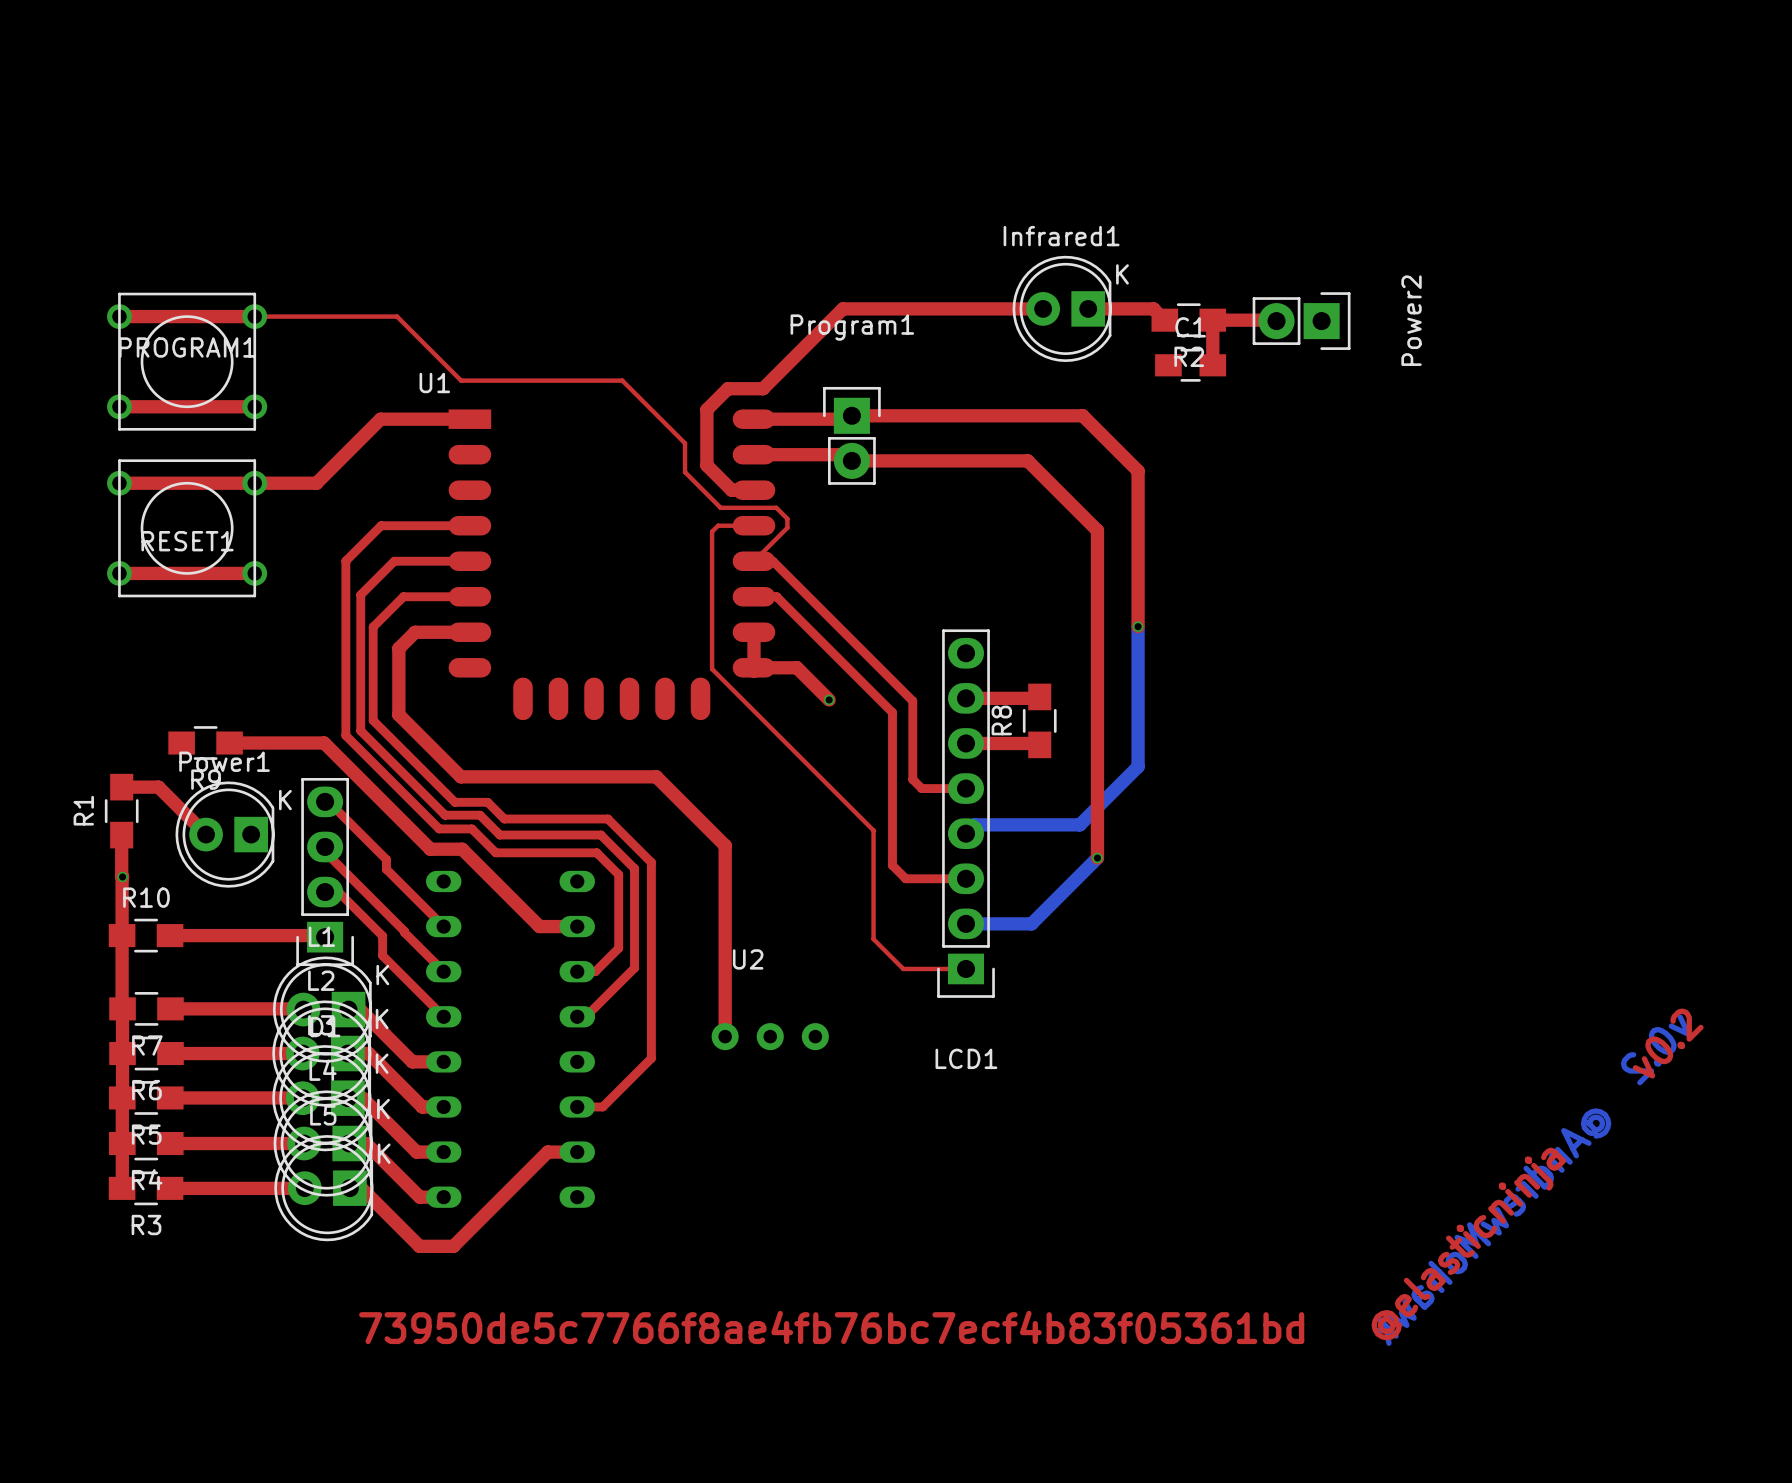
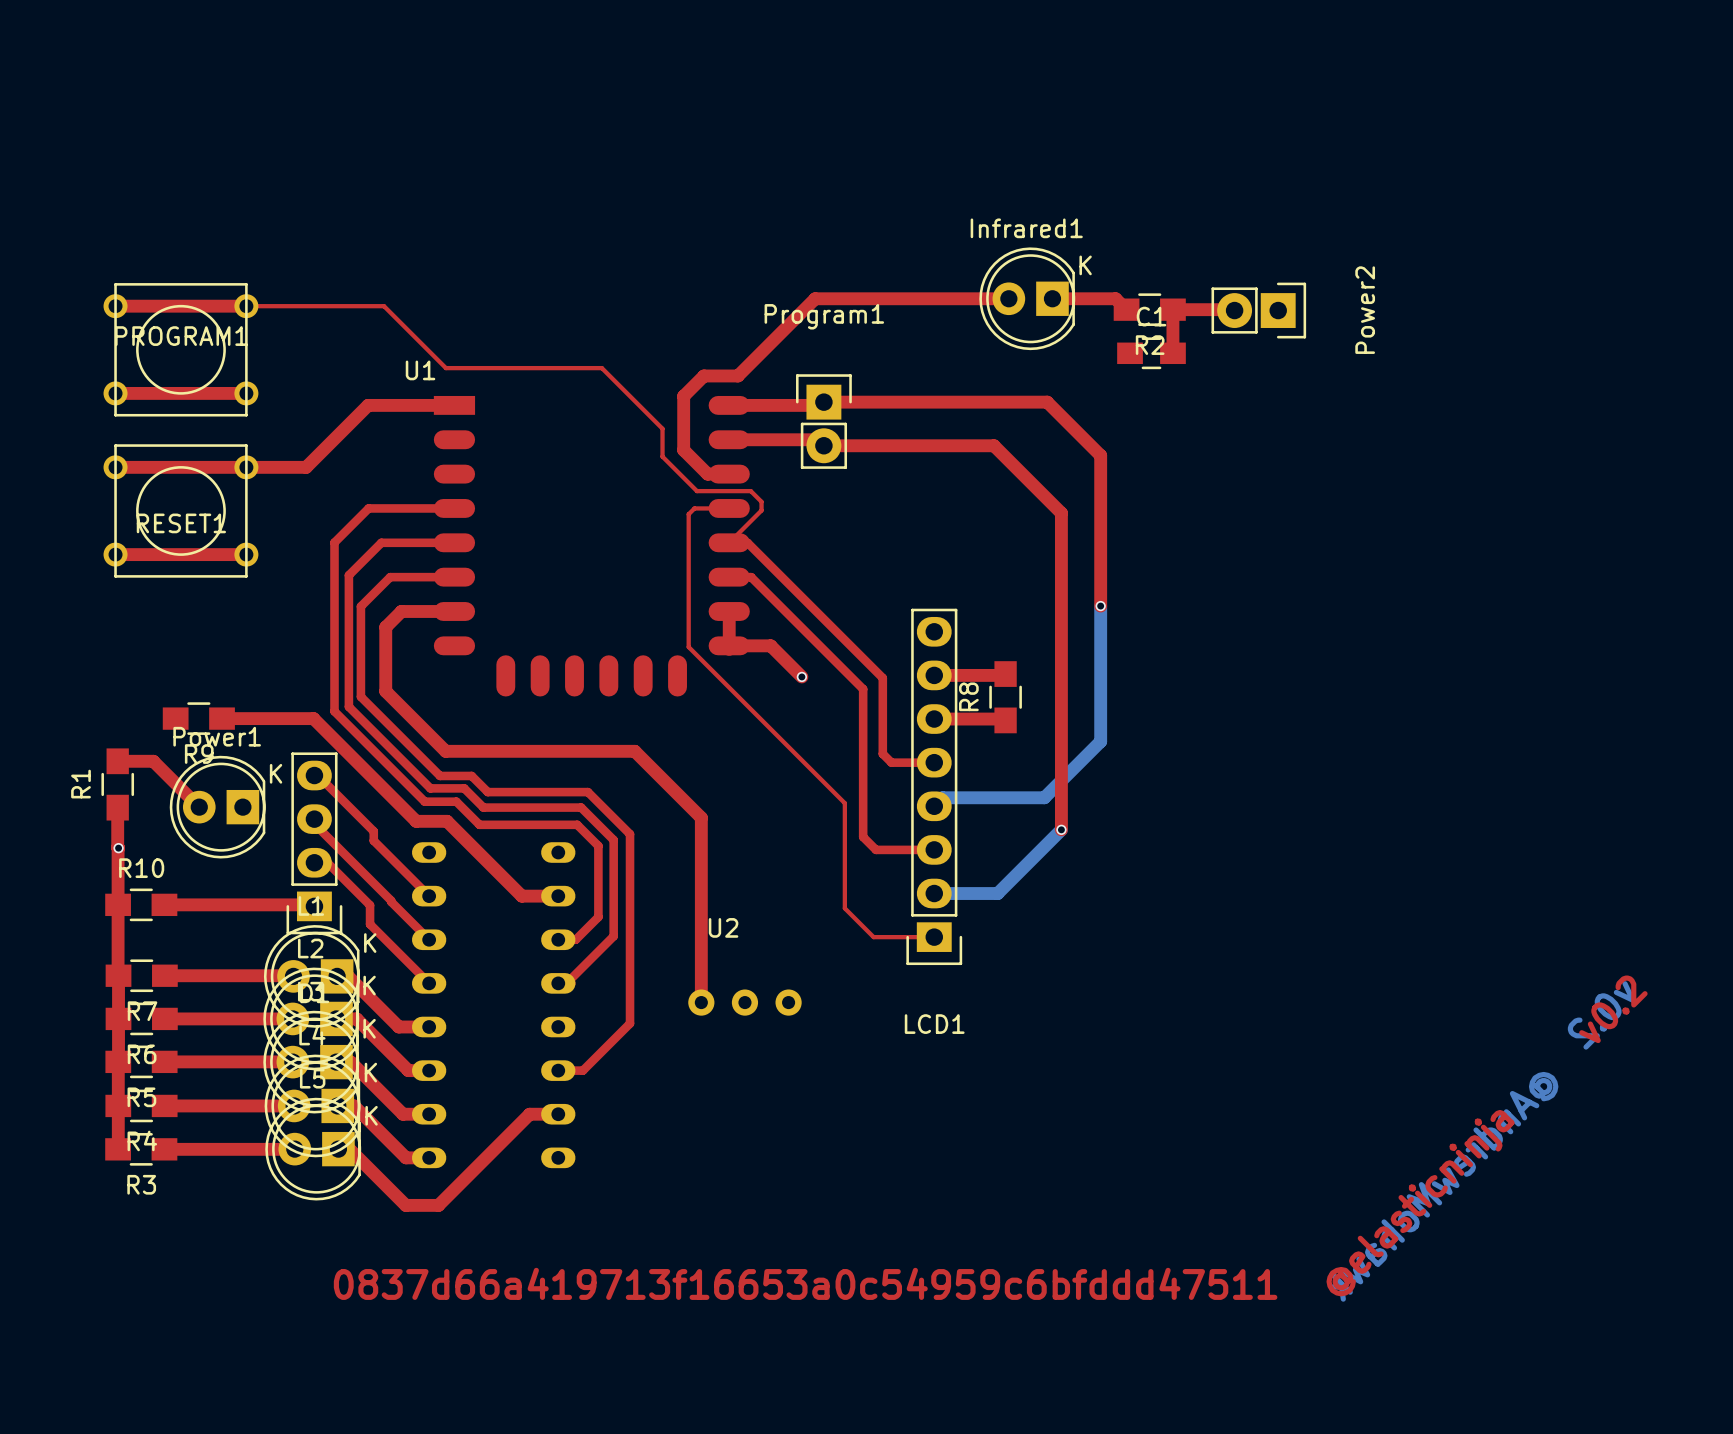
text: 73950de5c7766f8ae4fb76bc7ecf4b83f05361bd (831, 1327) -> 0837d66a419713f16653a0c54959c6bfddd47511 (805, 1283)

